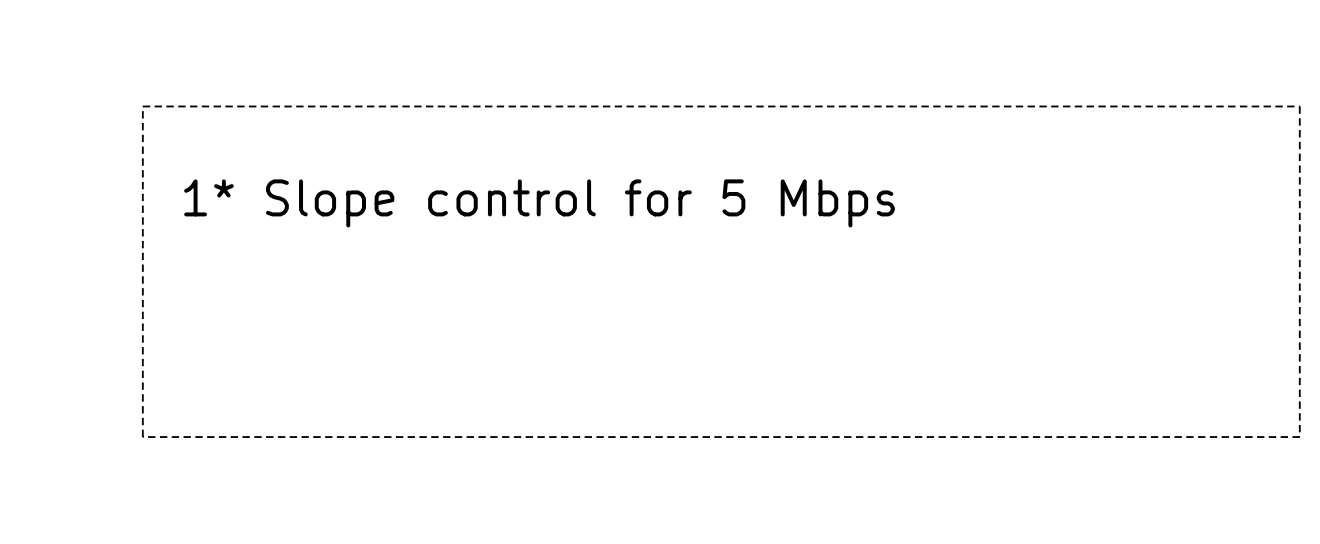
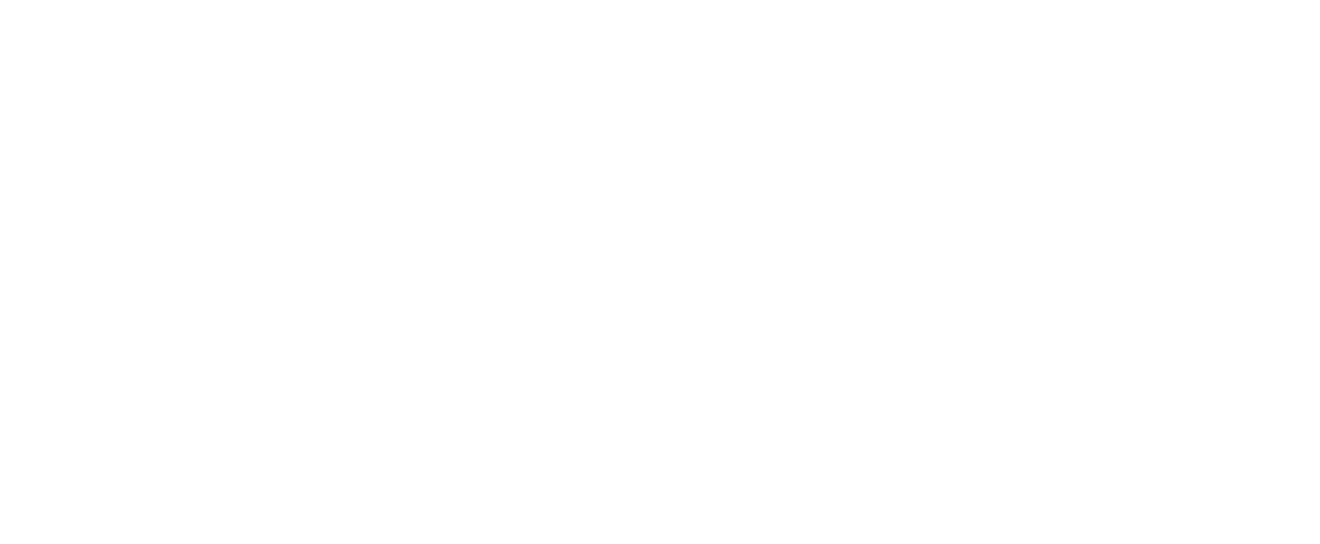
line: (142, 106) (1299, 106) (1299, 437) (142, 437) (142, 106) -> none
text: 1* Slope control for 5 Mbps (539, 203) -> none

